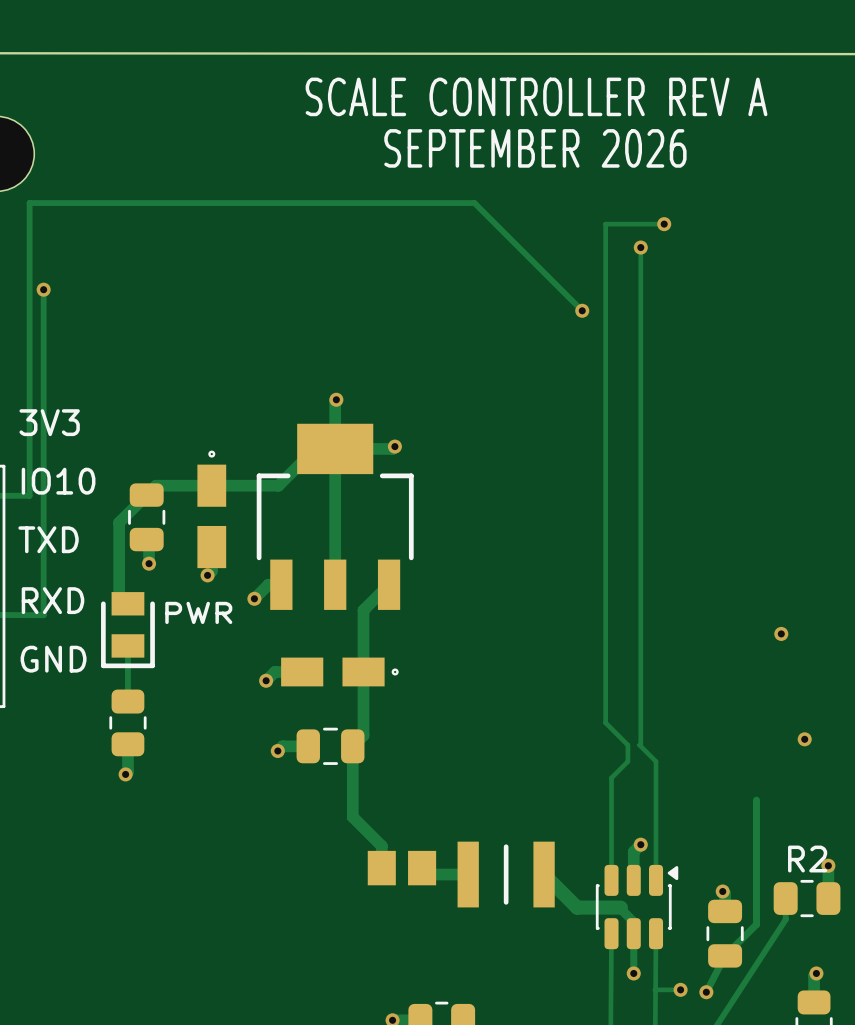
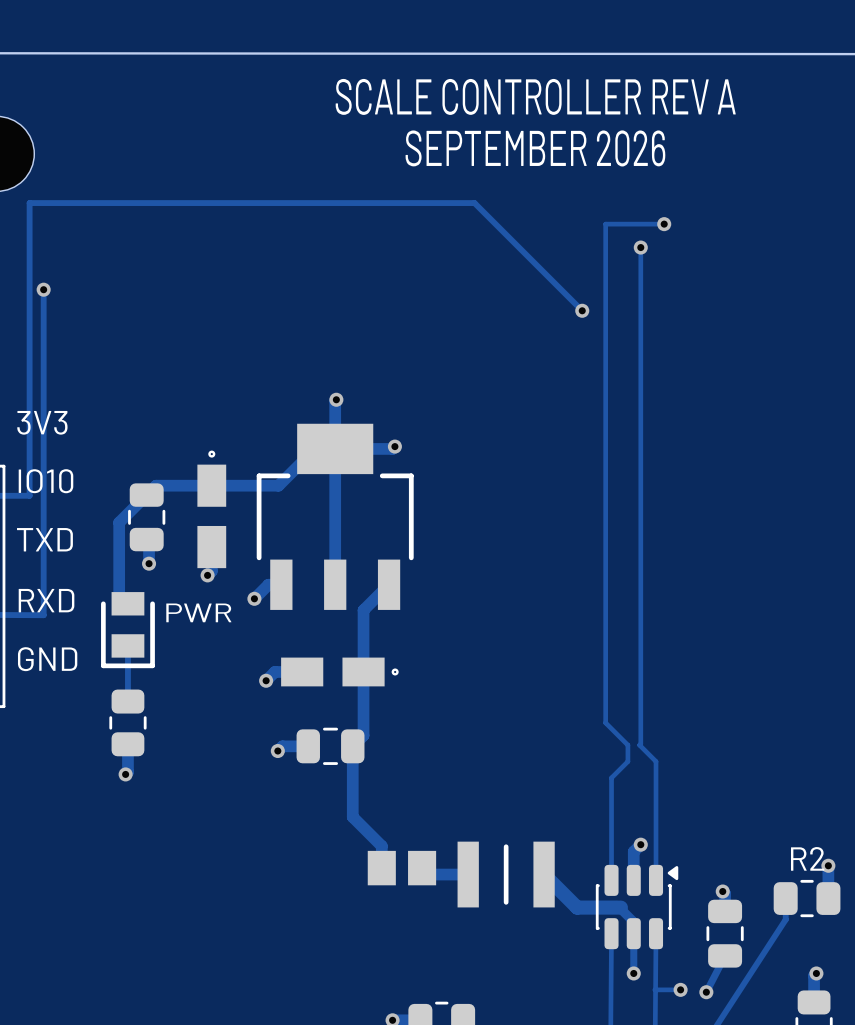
via: (781, 633) -> none
via: (804, 739) -> none
track: (756, 800) (756, 924) (725, 955) -> none

